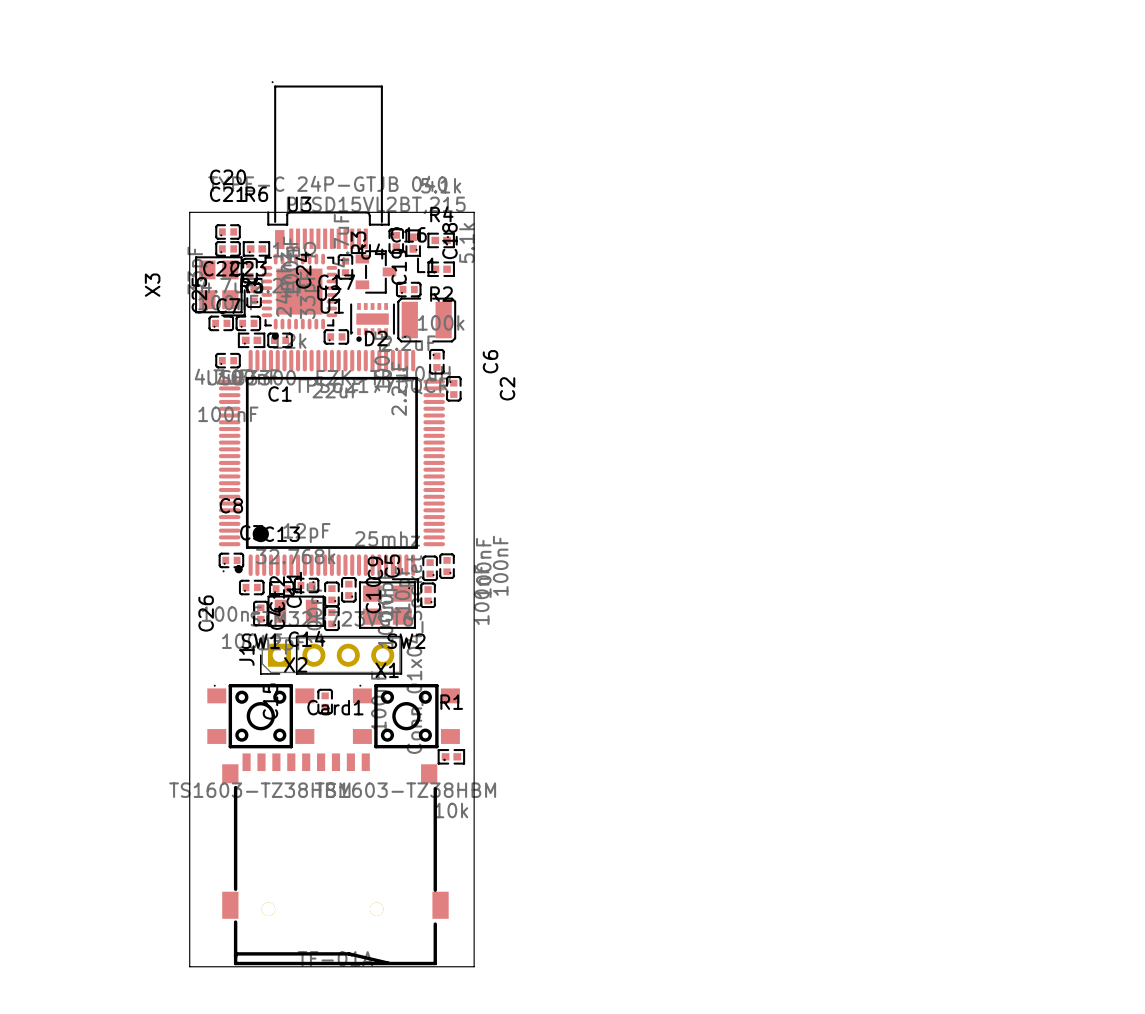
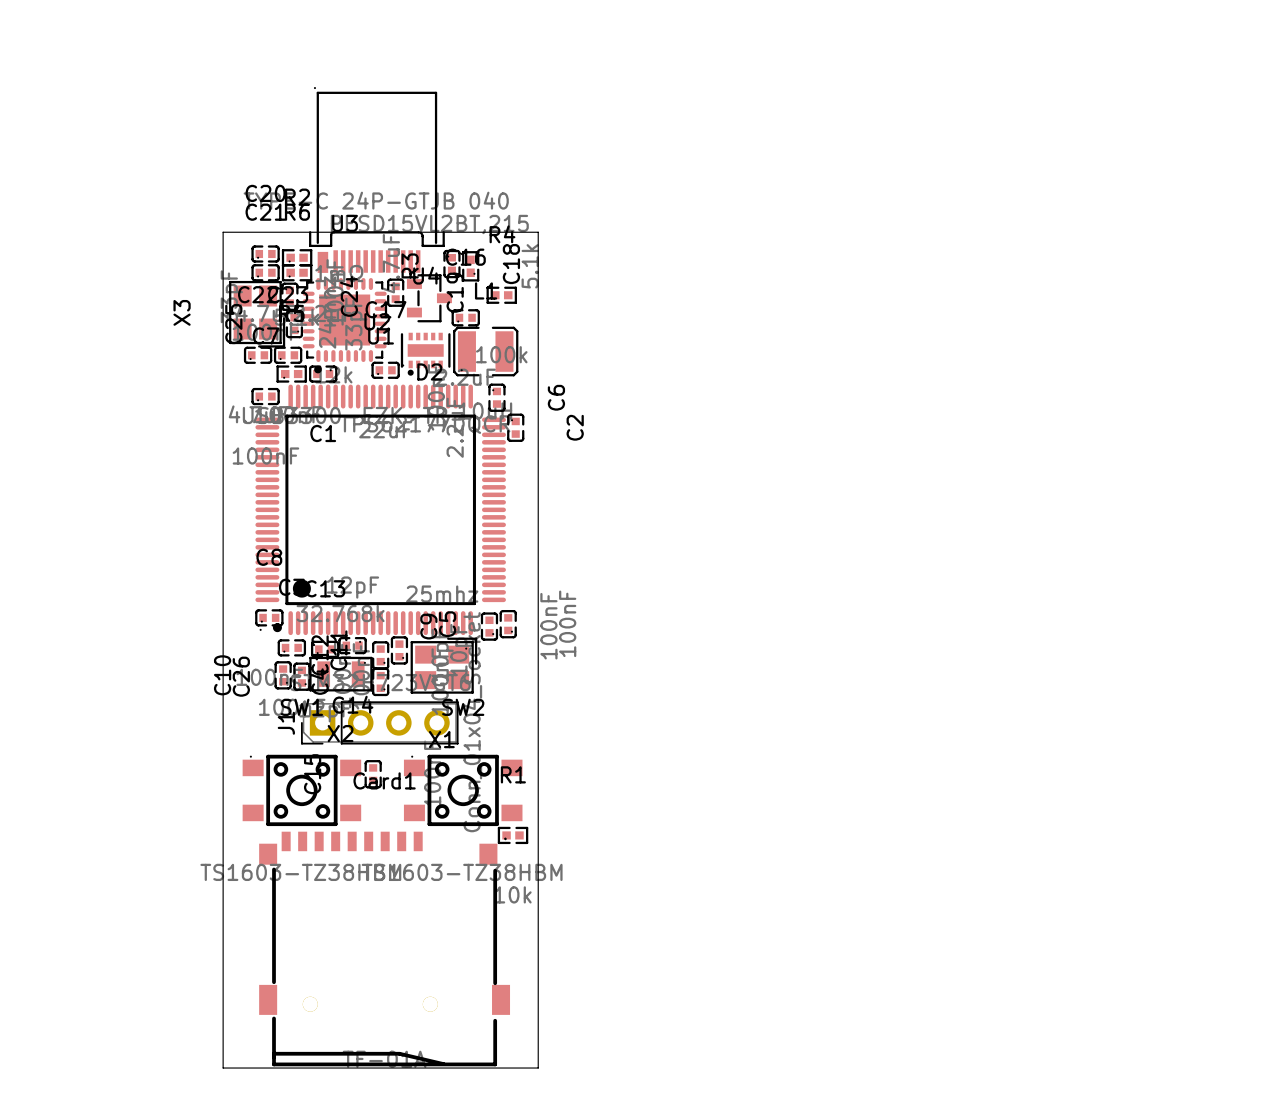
R2 rotation: 0° (441, 240) -> 180° (297, 257)
R2 position: (441, 240) -> (297, 257)
C10 position: (428, 595) -> (283, 675)

